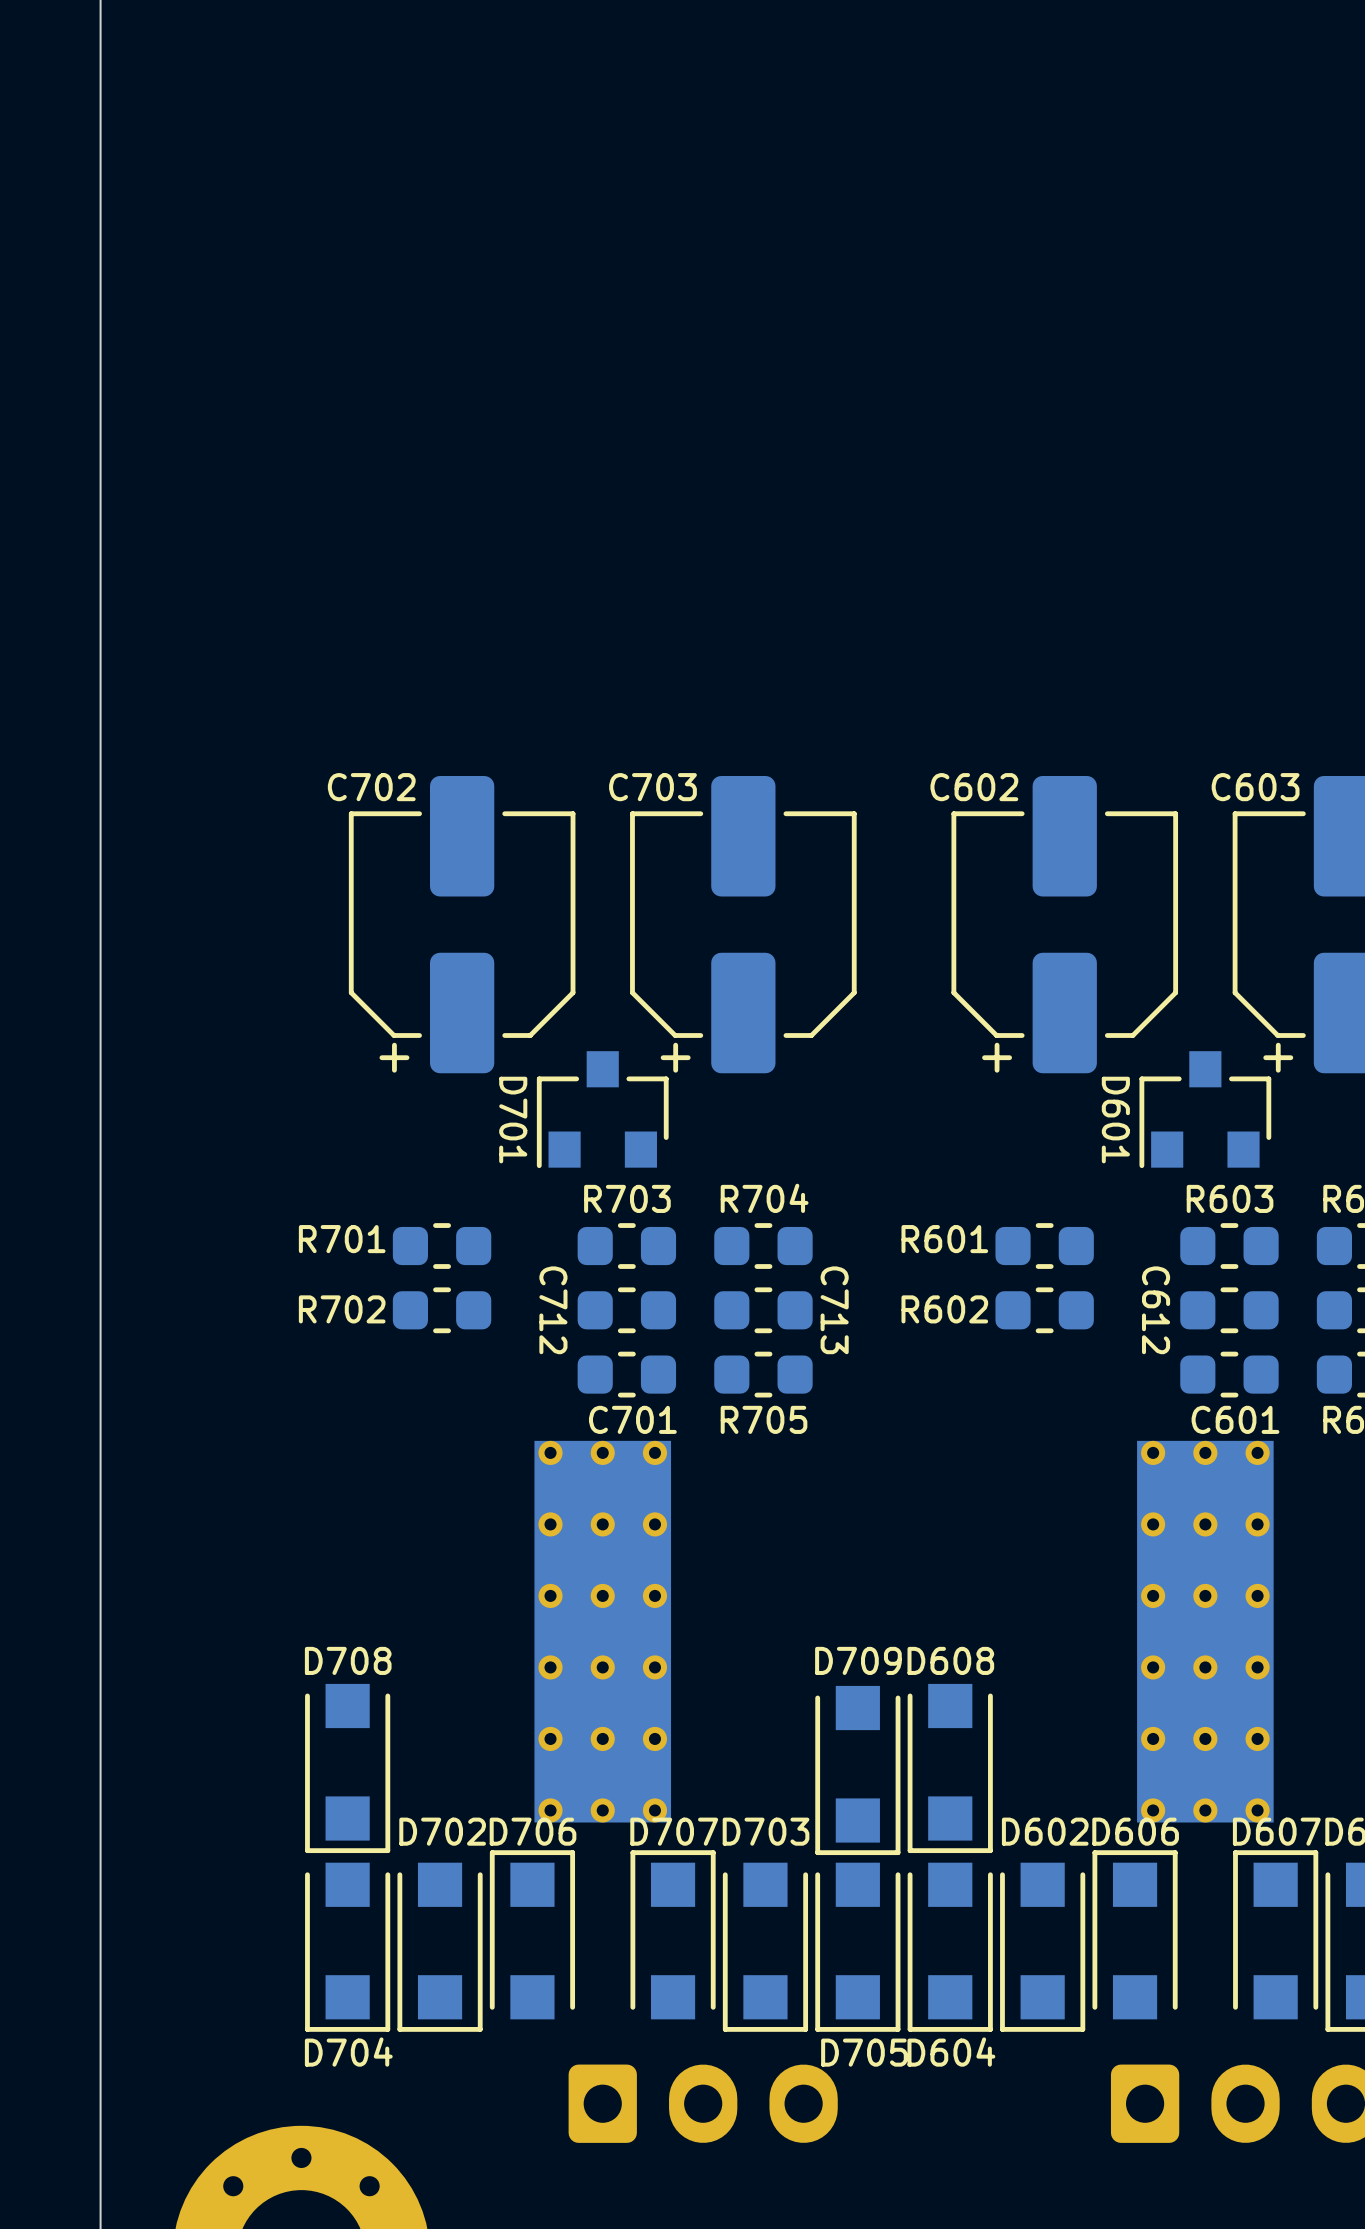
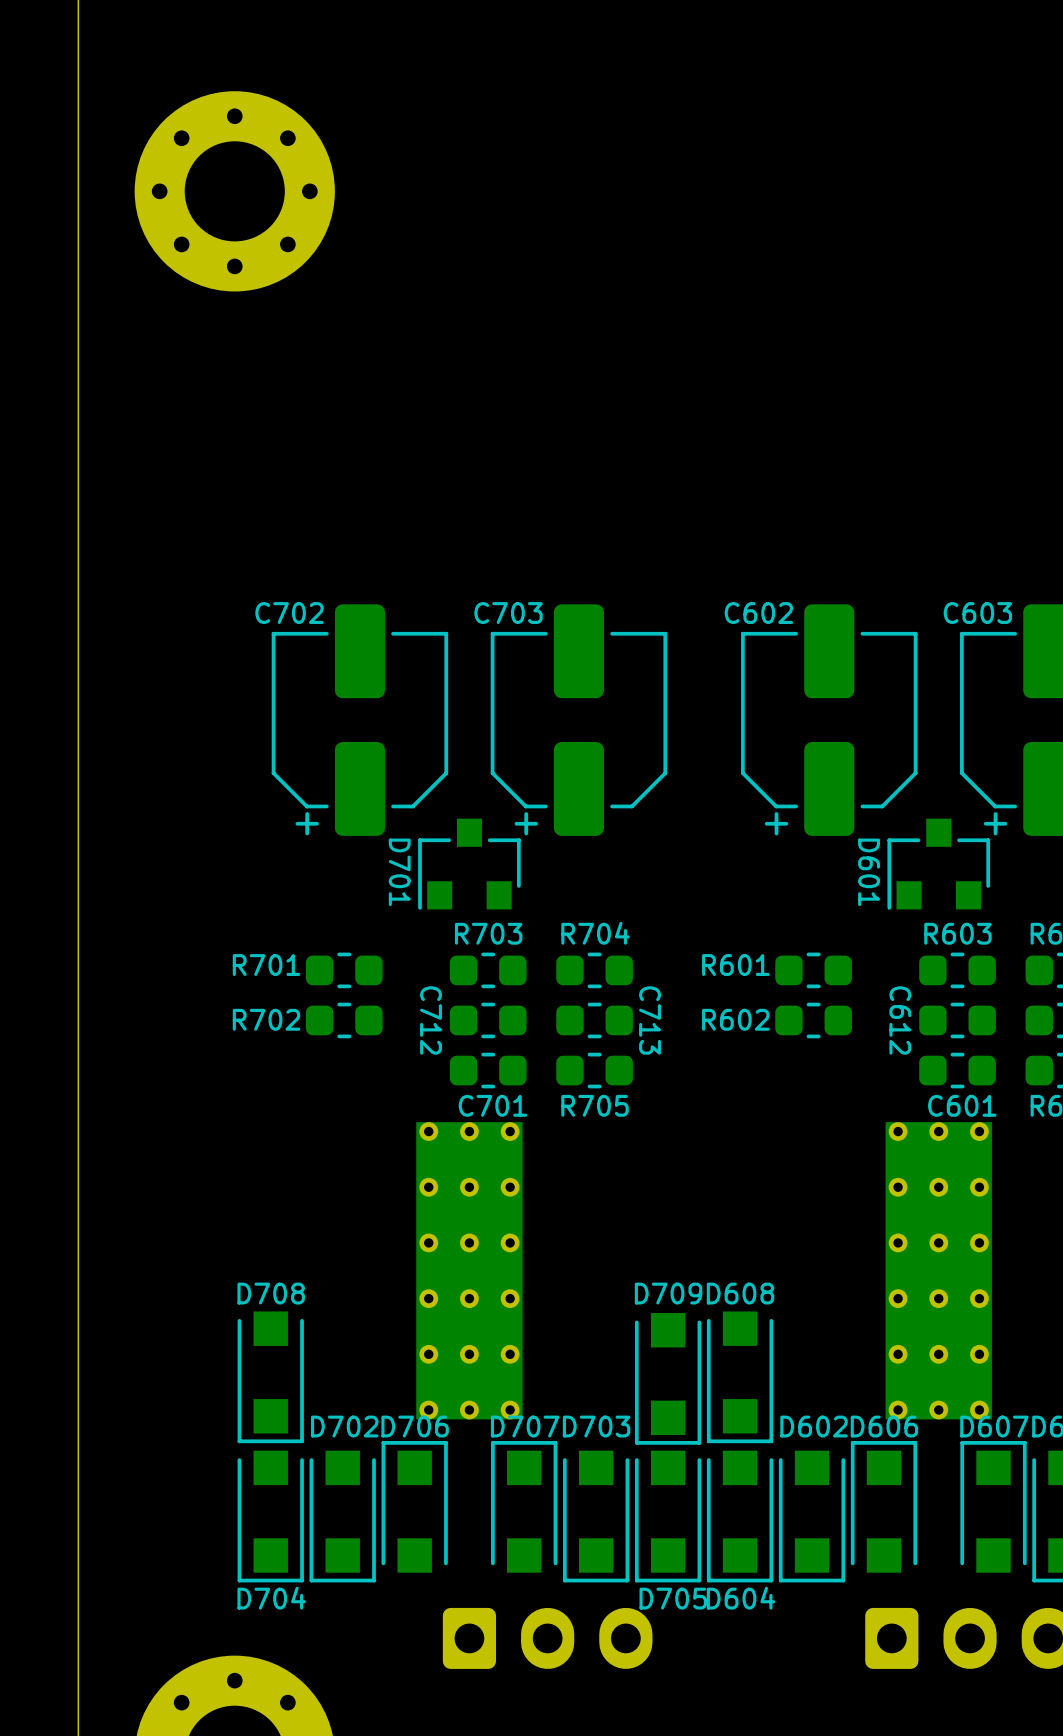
part: none -> (234, 191)

